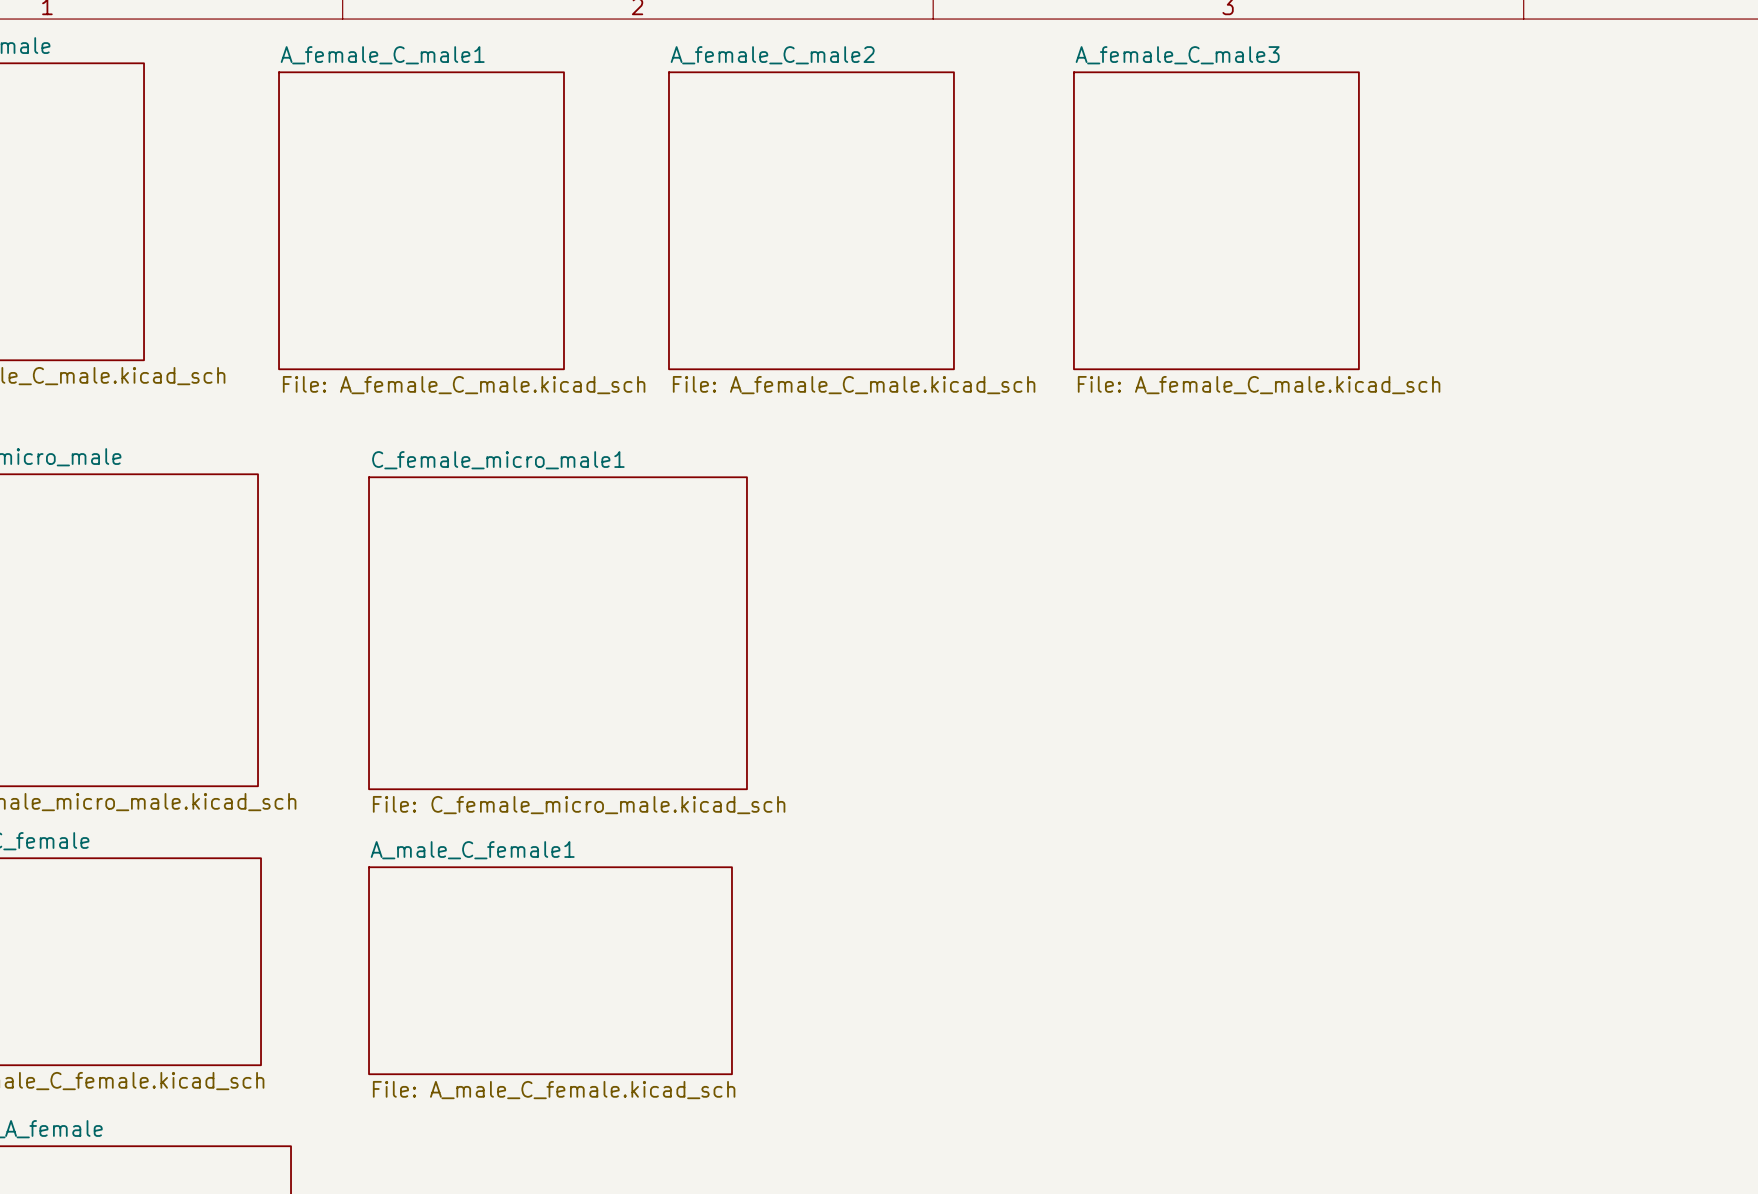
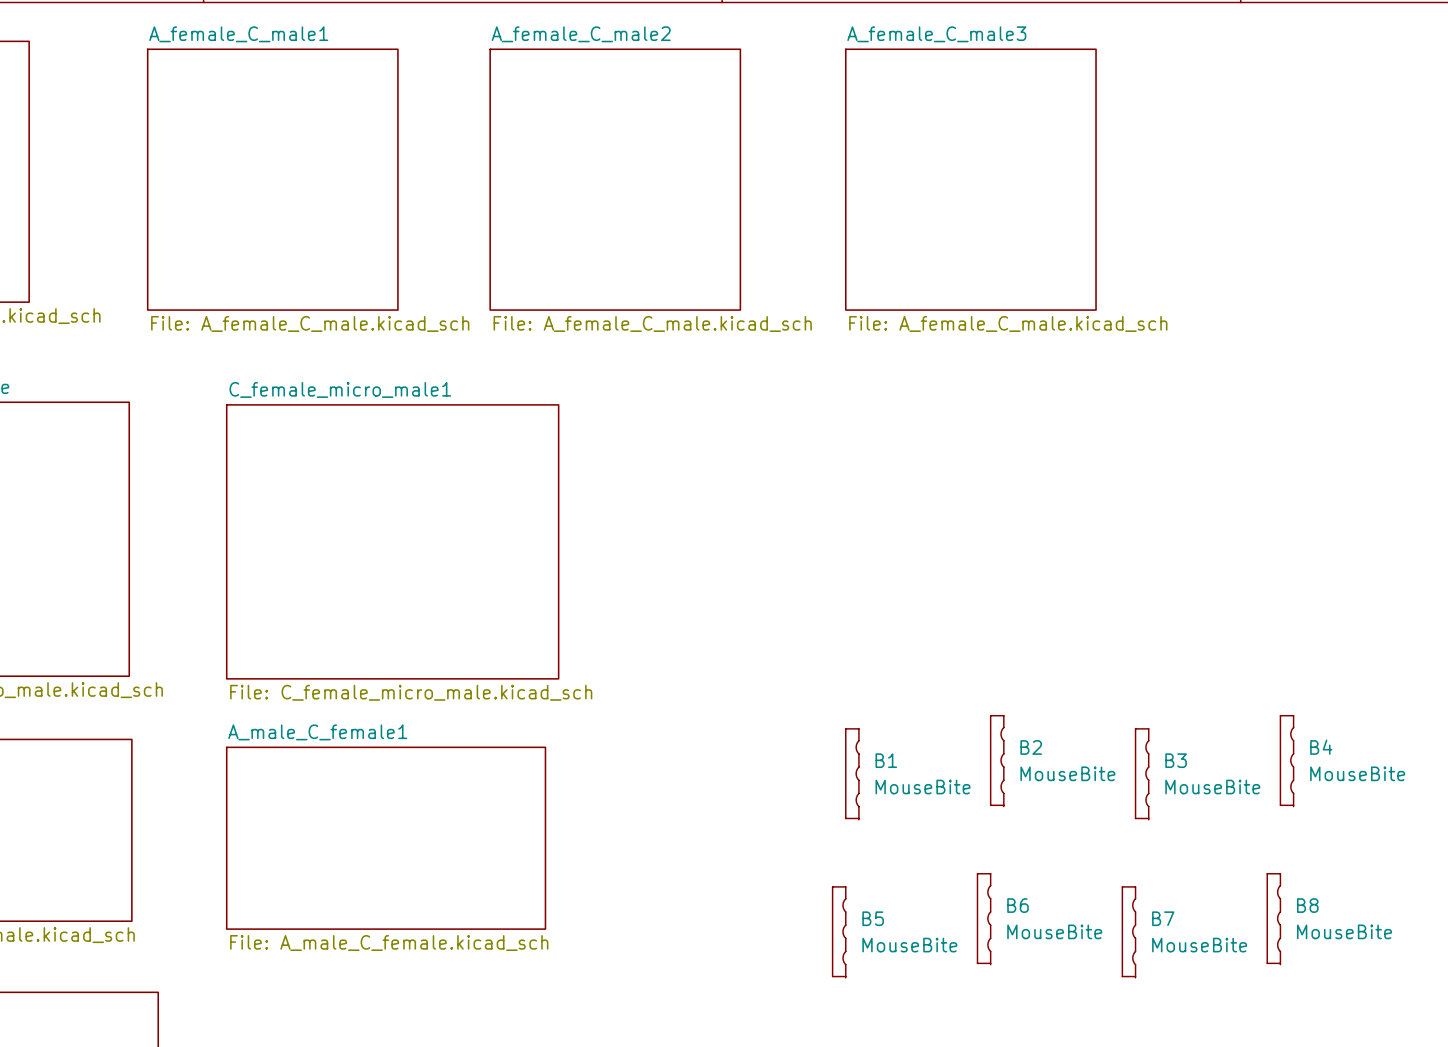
B2: none -> MouseBite (997, 761)
B4: none -> MouseBite (1287, 761)
B1: none -> MouseBite (852, 774)
B3: none -> MouseBite (1142, 774)
B6: none -> MouseBite (984, 919)
B8: none -> MouseBite (1273, 919)
B5: none -> MouseBite (839, 932)
B7: none -> MouseBite (1128, 932)

